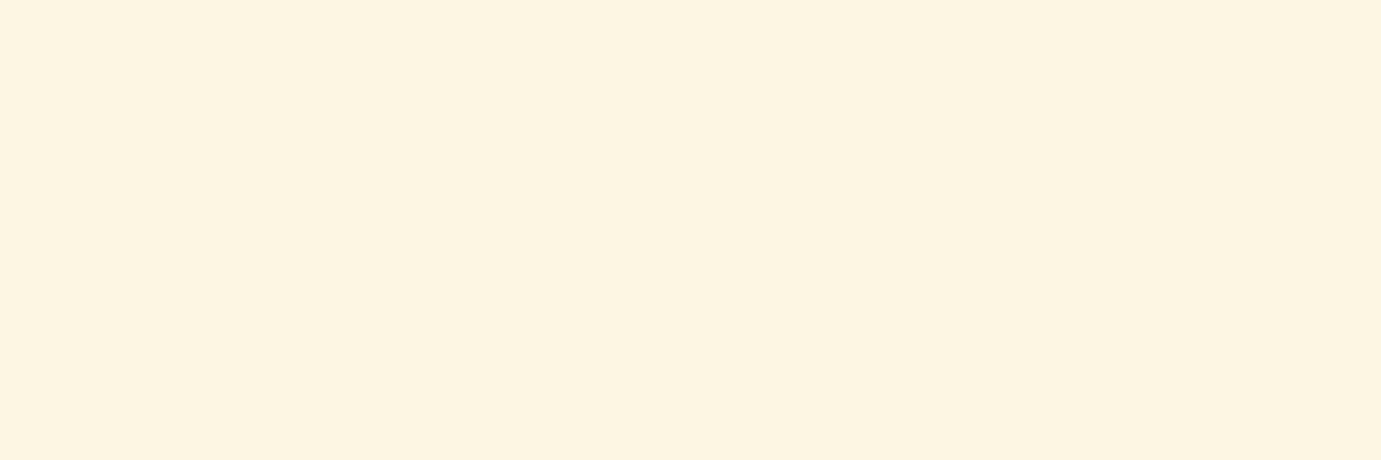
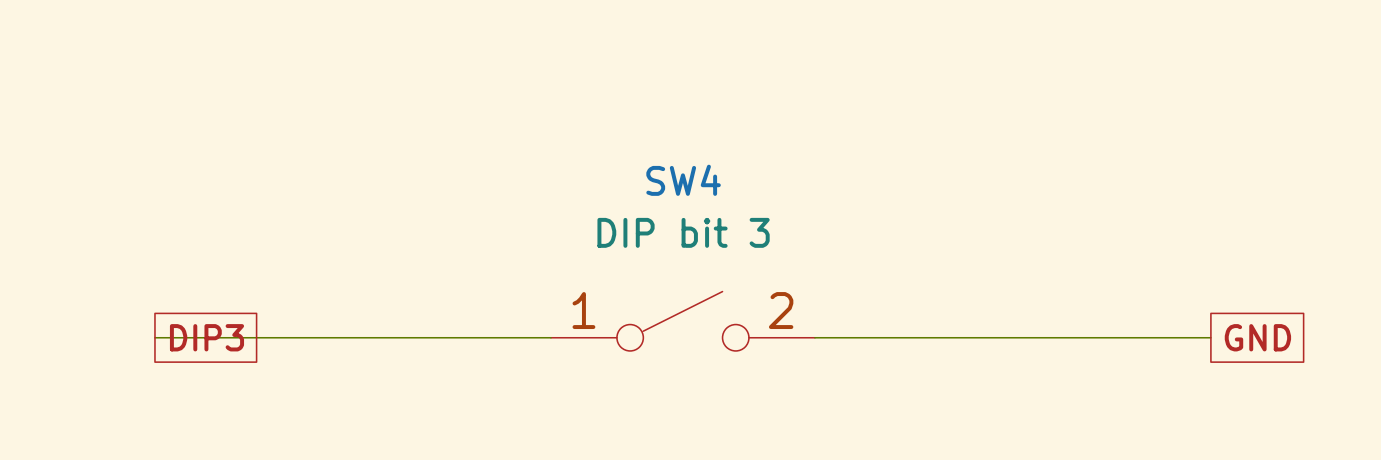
SW4: none -> DIP bit 3 (682, 321)
wire: none -> (154, 337) (550, 337)
global label: none -> DIP3 (206, 337)
wire: none -> (814, 337) (1210, 337)
global label: none -> GND (1257, 337)

